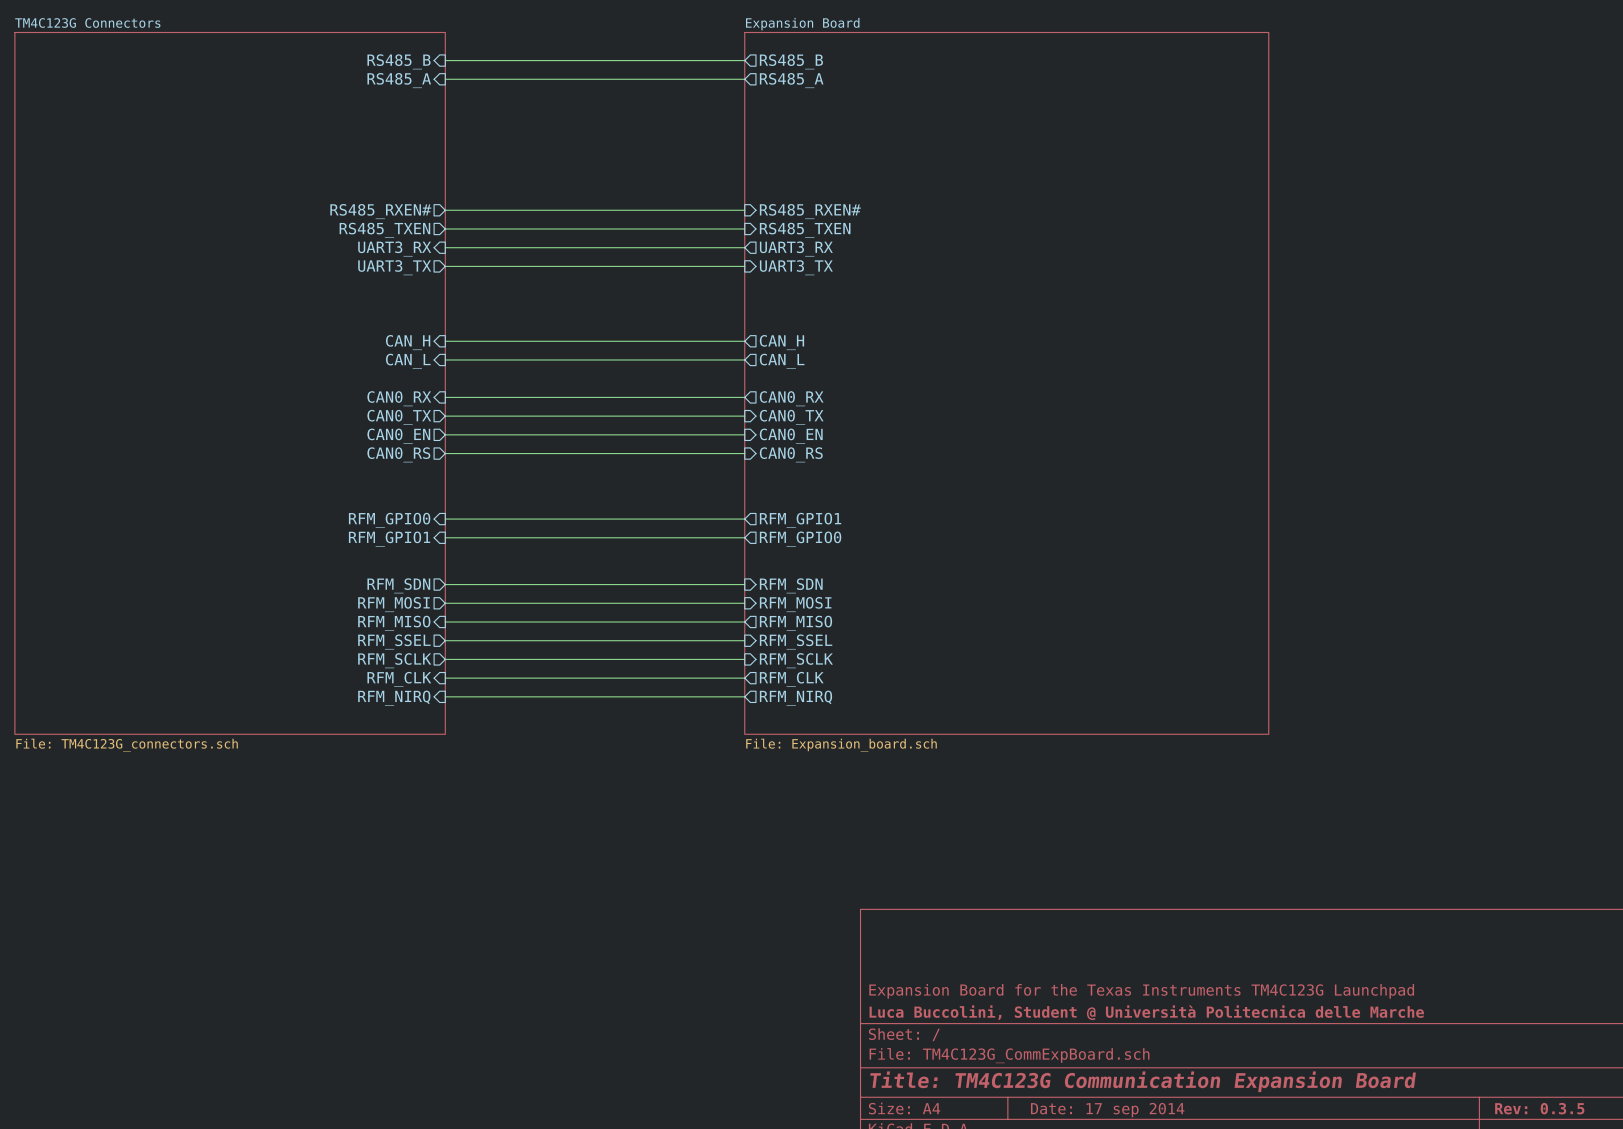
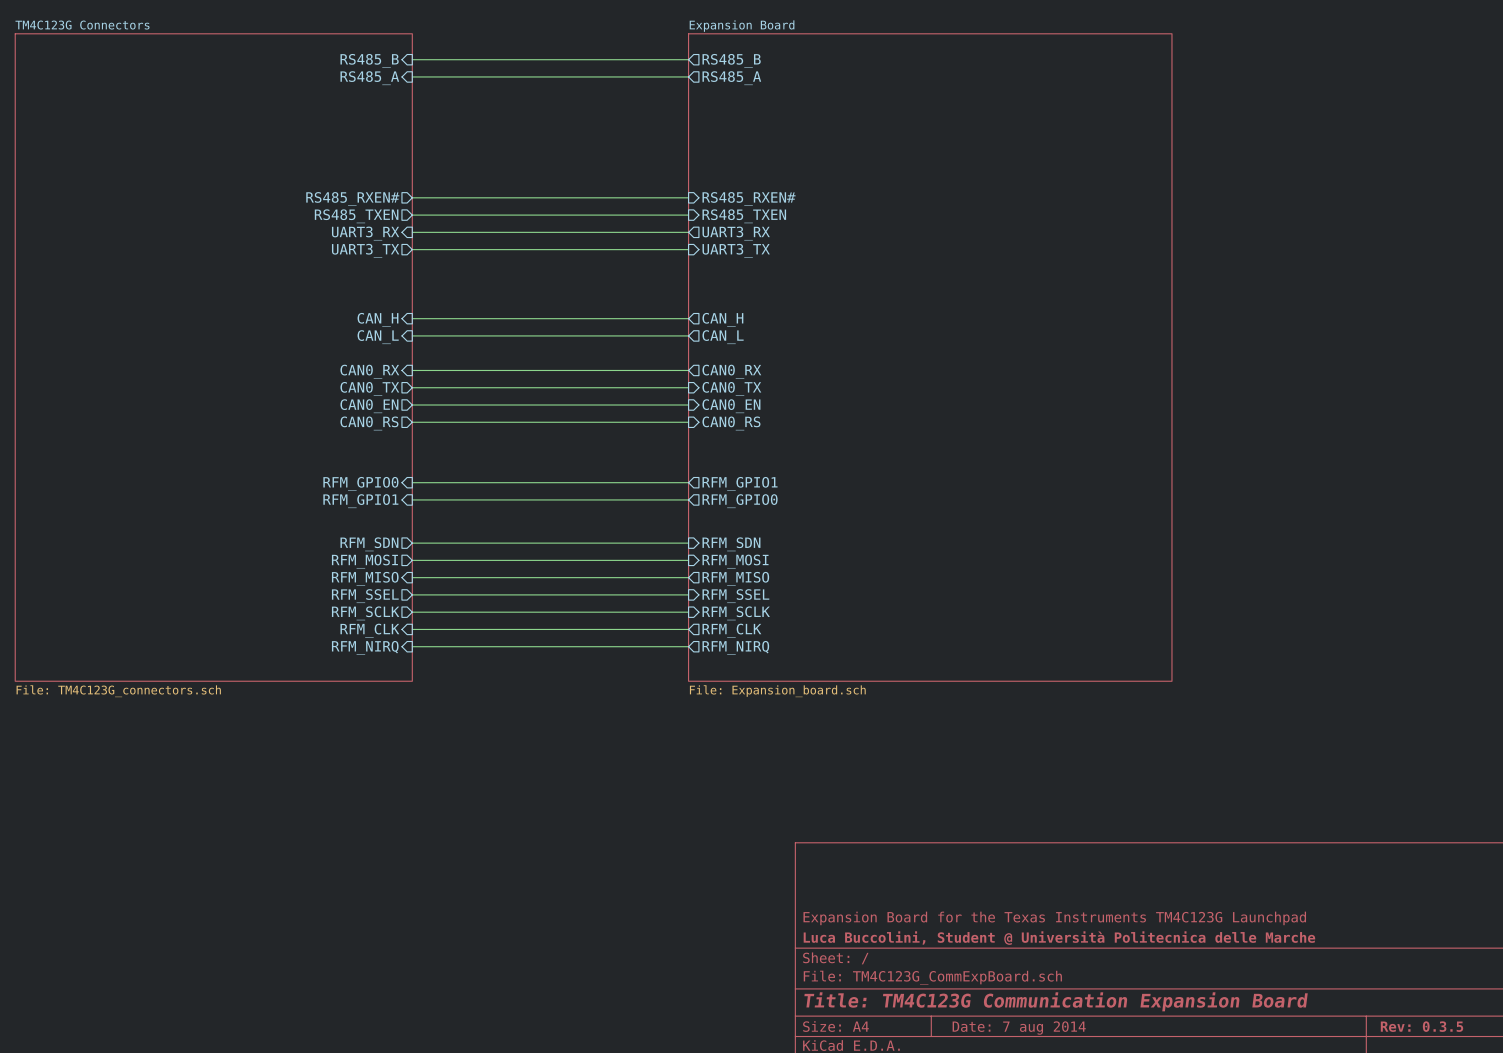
title block: Date: 17 sep 2014 (1107, 1110) -> Date: 7 aug 2014 (1019, 1028)

